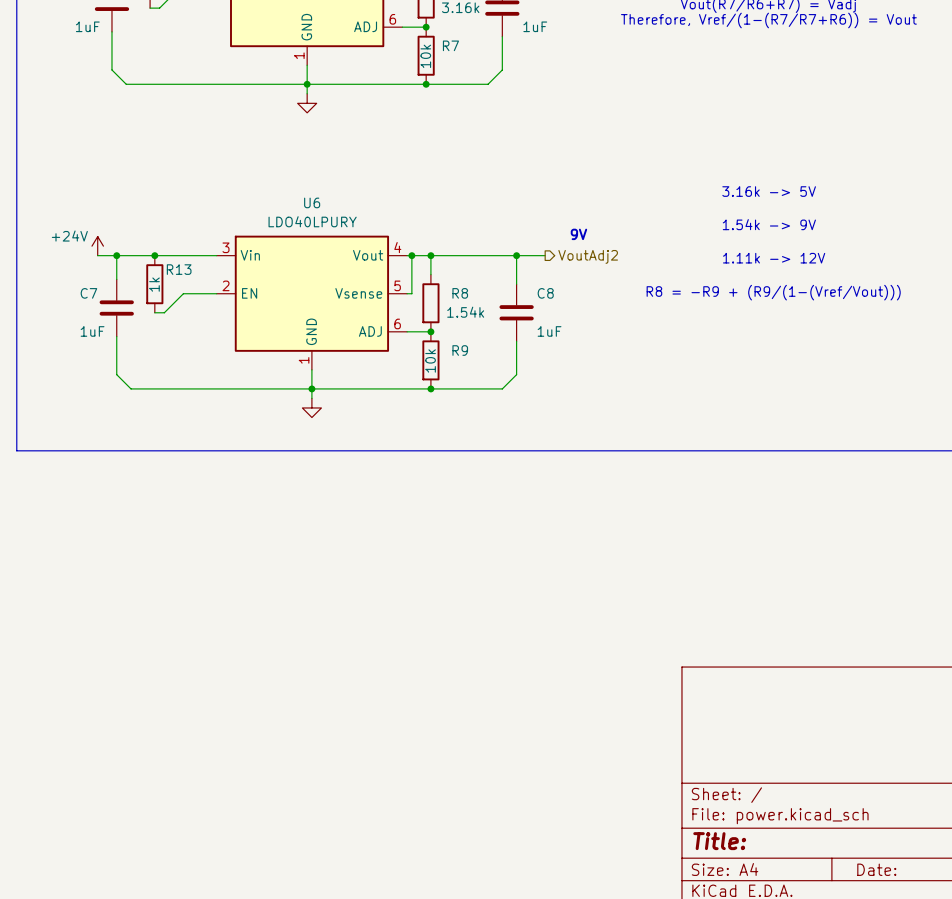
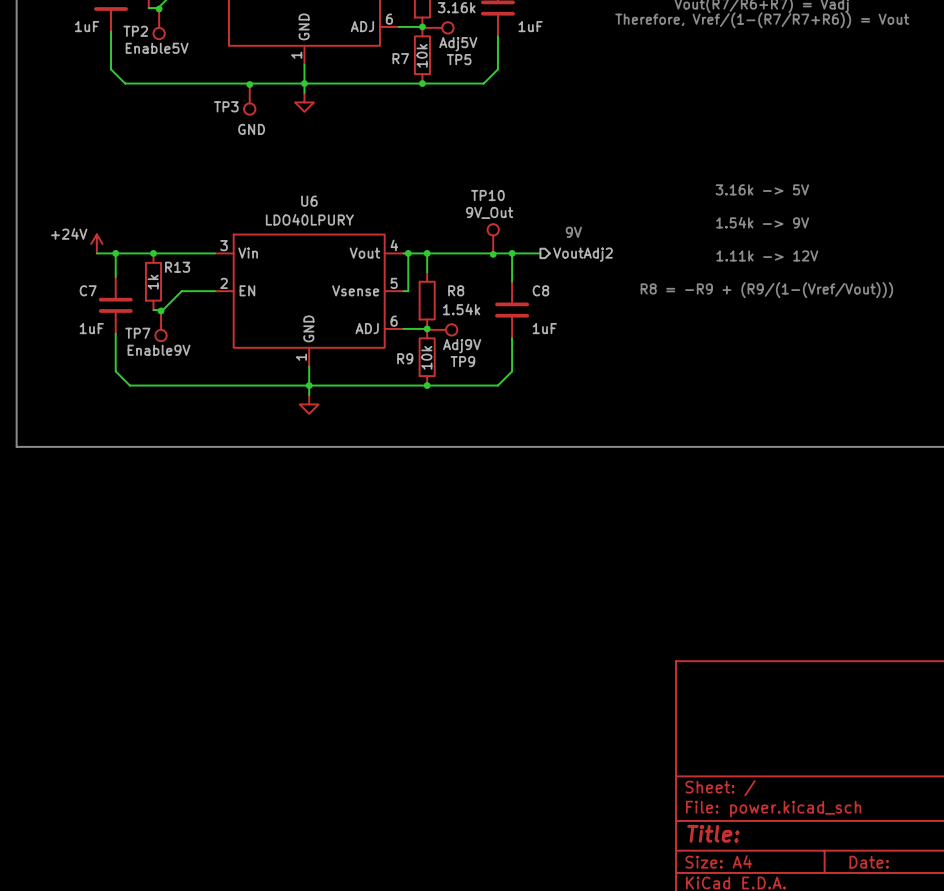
junction: none -> (159, 8)
TP2: none -> Enable5V (159, 24)
TP5: none -> Adj5V (438, 27)
R7 name position: R7 (450, 45) -> R7 (400, 58)
junction: none -> (249, 84)
TP3: none -> GND (249, 99)
TP10: none -> 9V_Out (493, 239)
junction: none -> (493, 254)
junction: none -> (161, 310)
TP7: none -> Enable9V (161, 326)
TP9: none -> Adj9V (442, 329)
R9 name position: R9 (460, 350) -> R9 (405, 358)

